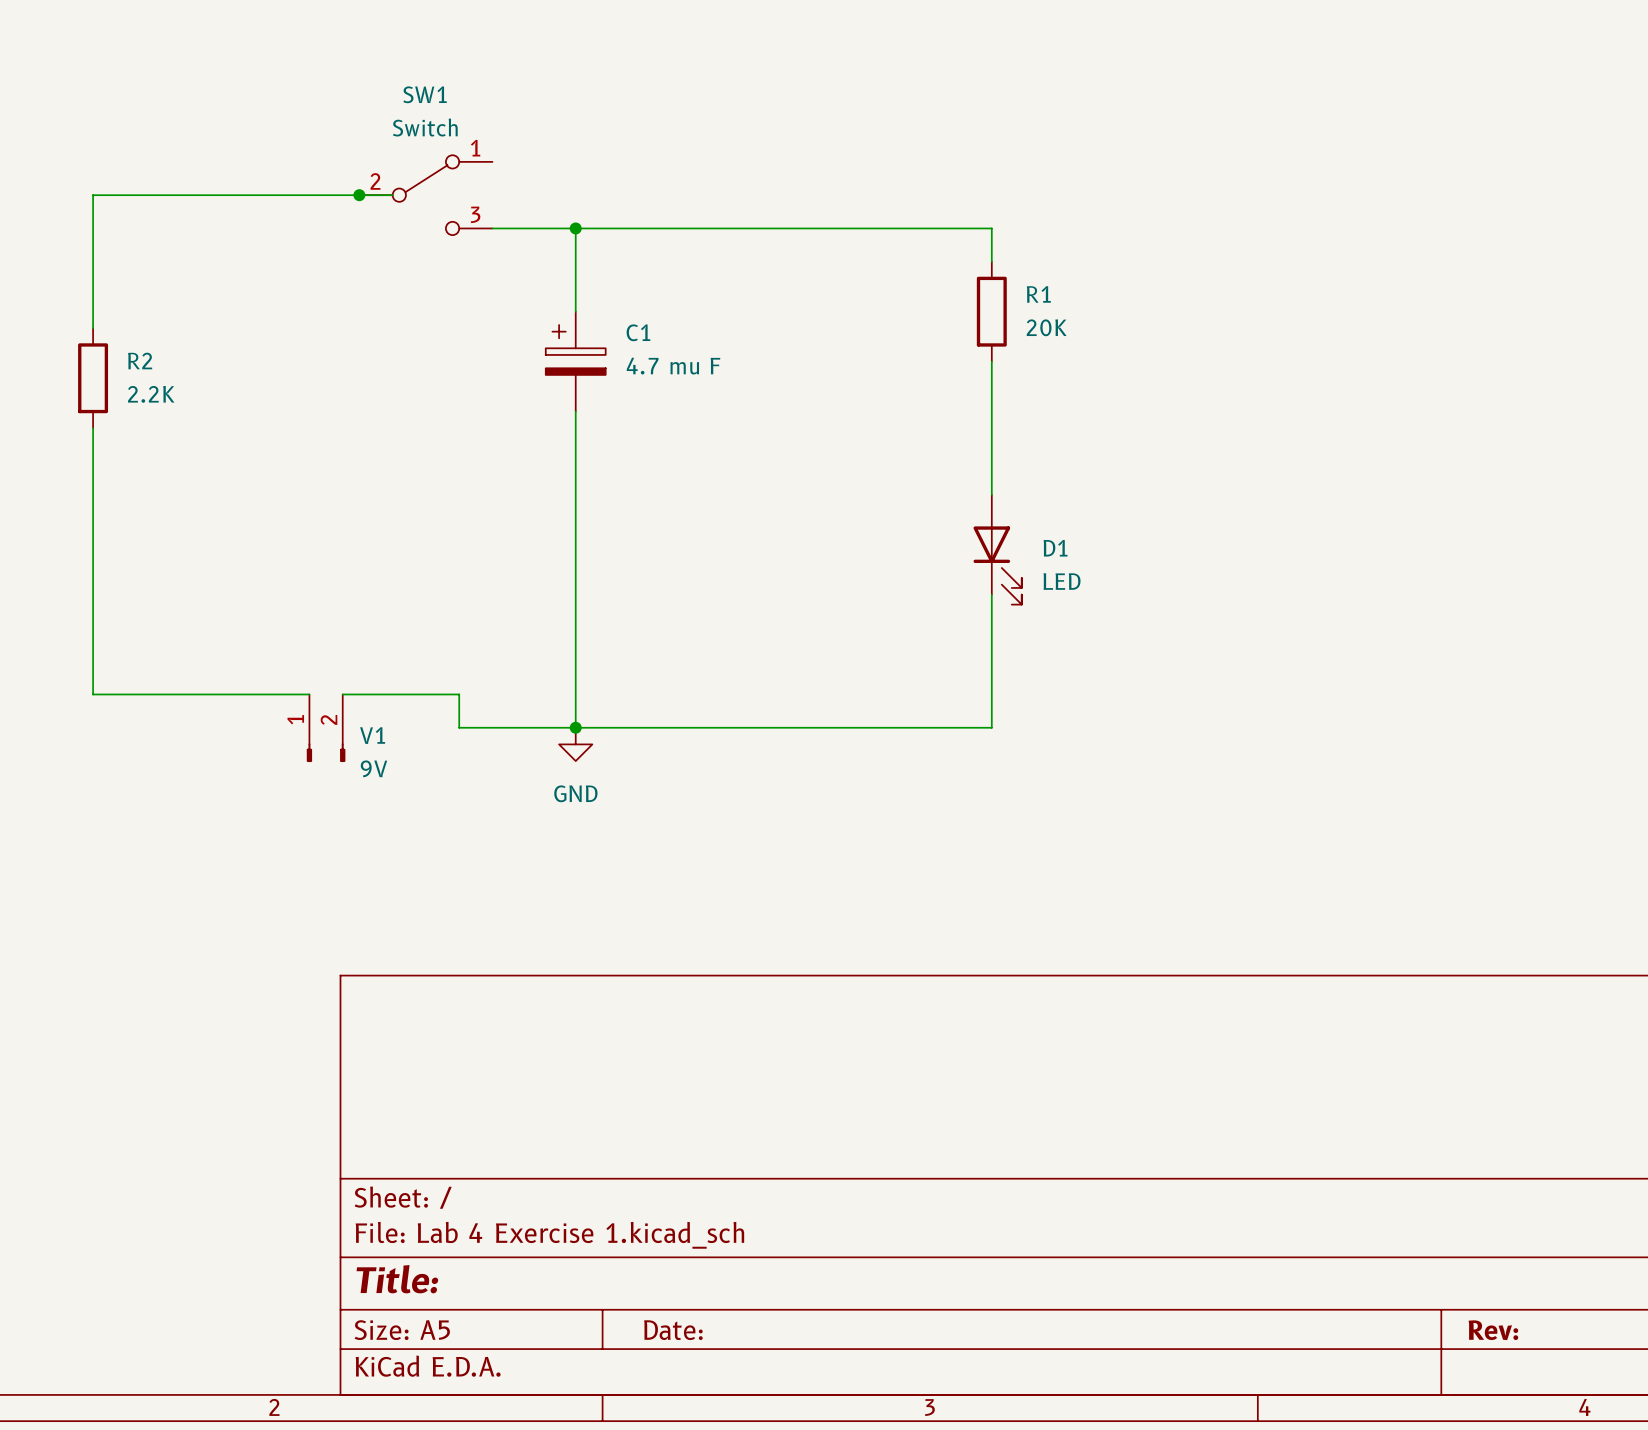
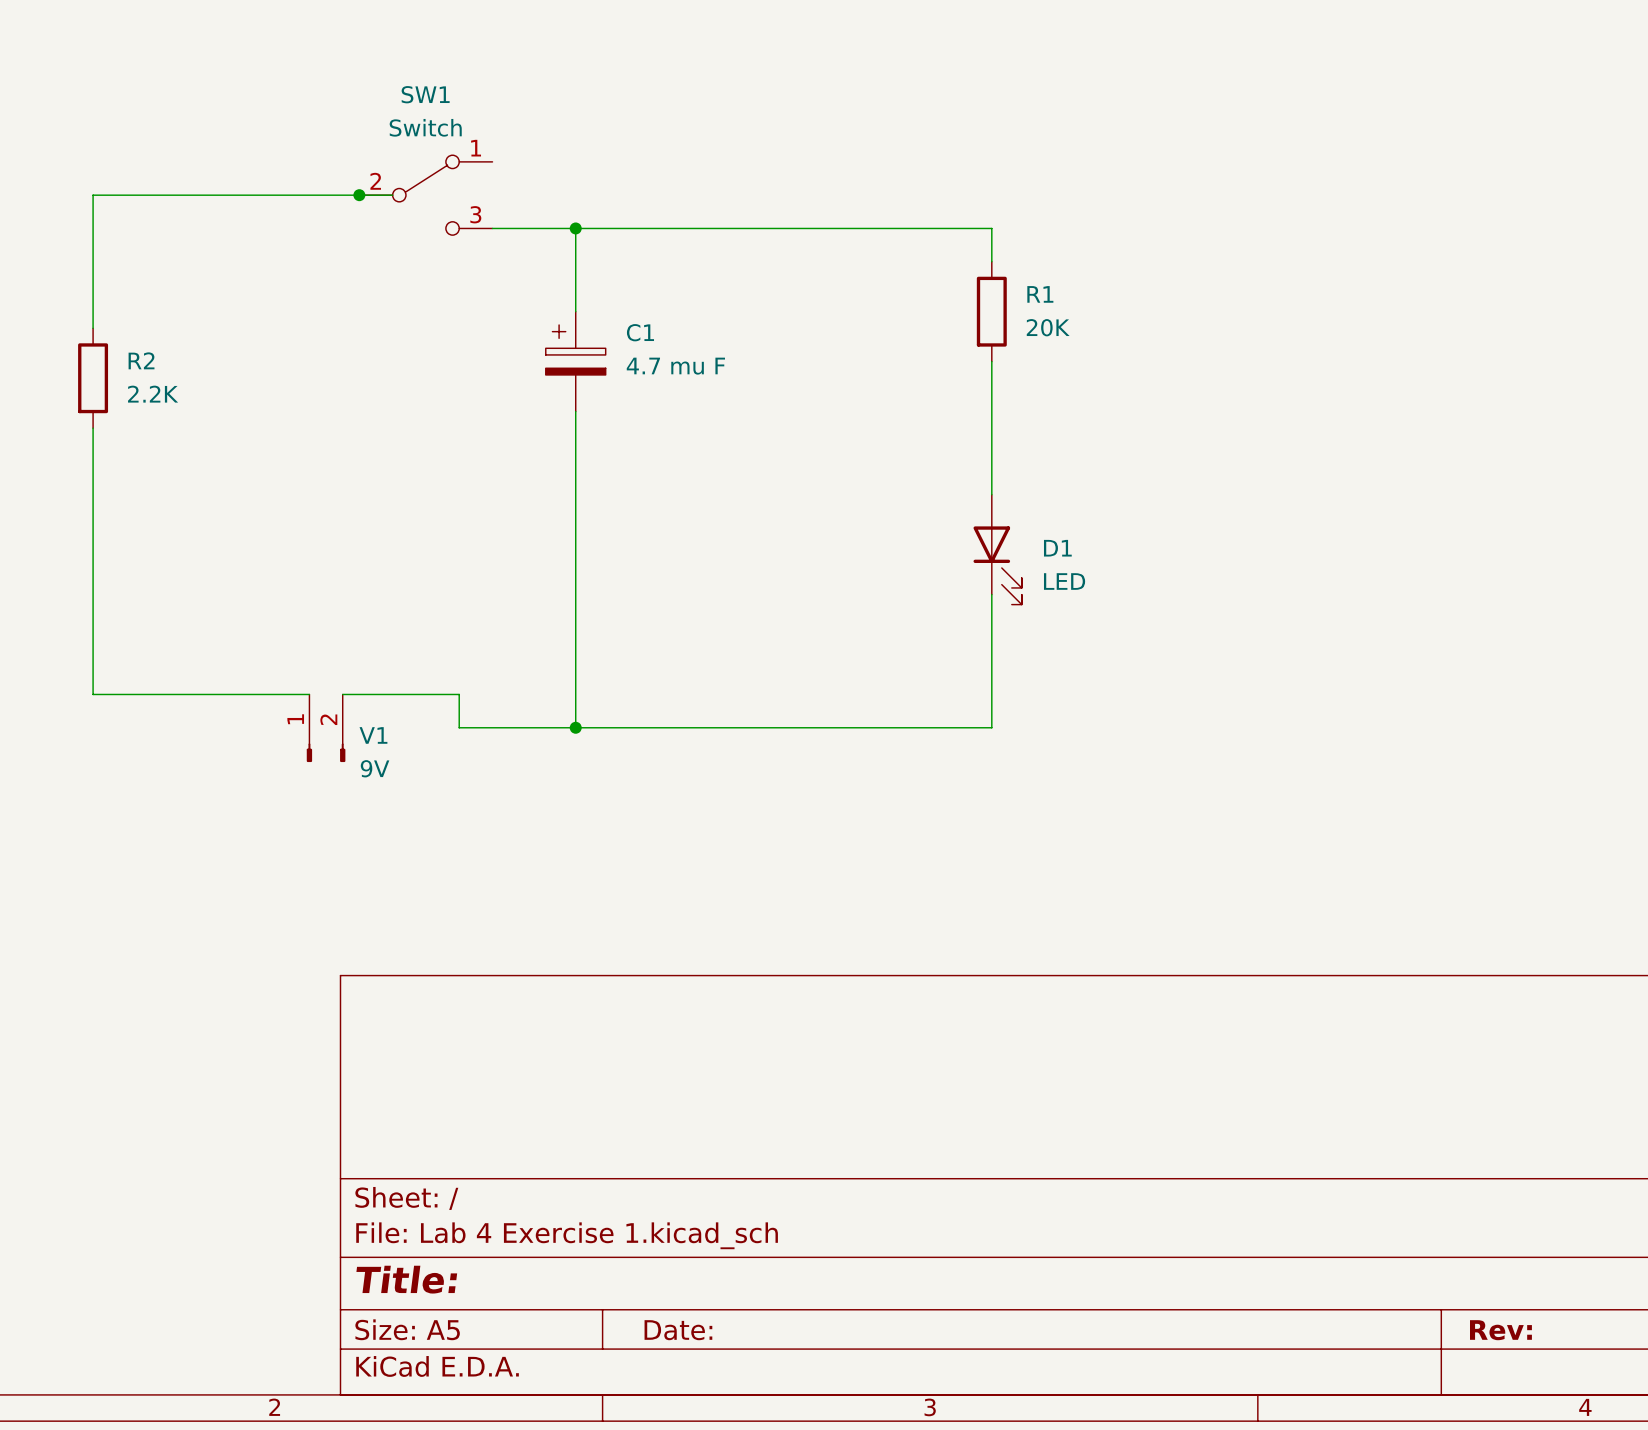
power symbol: GND (575, 744) -> none

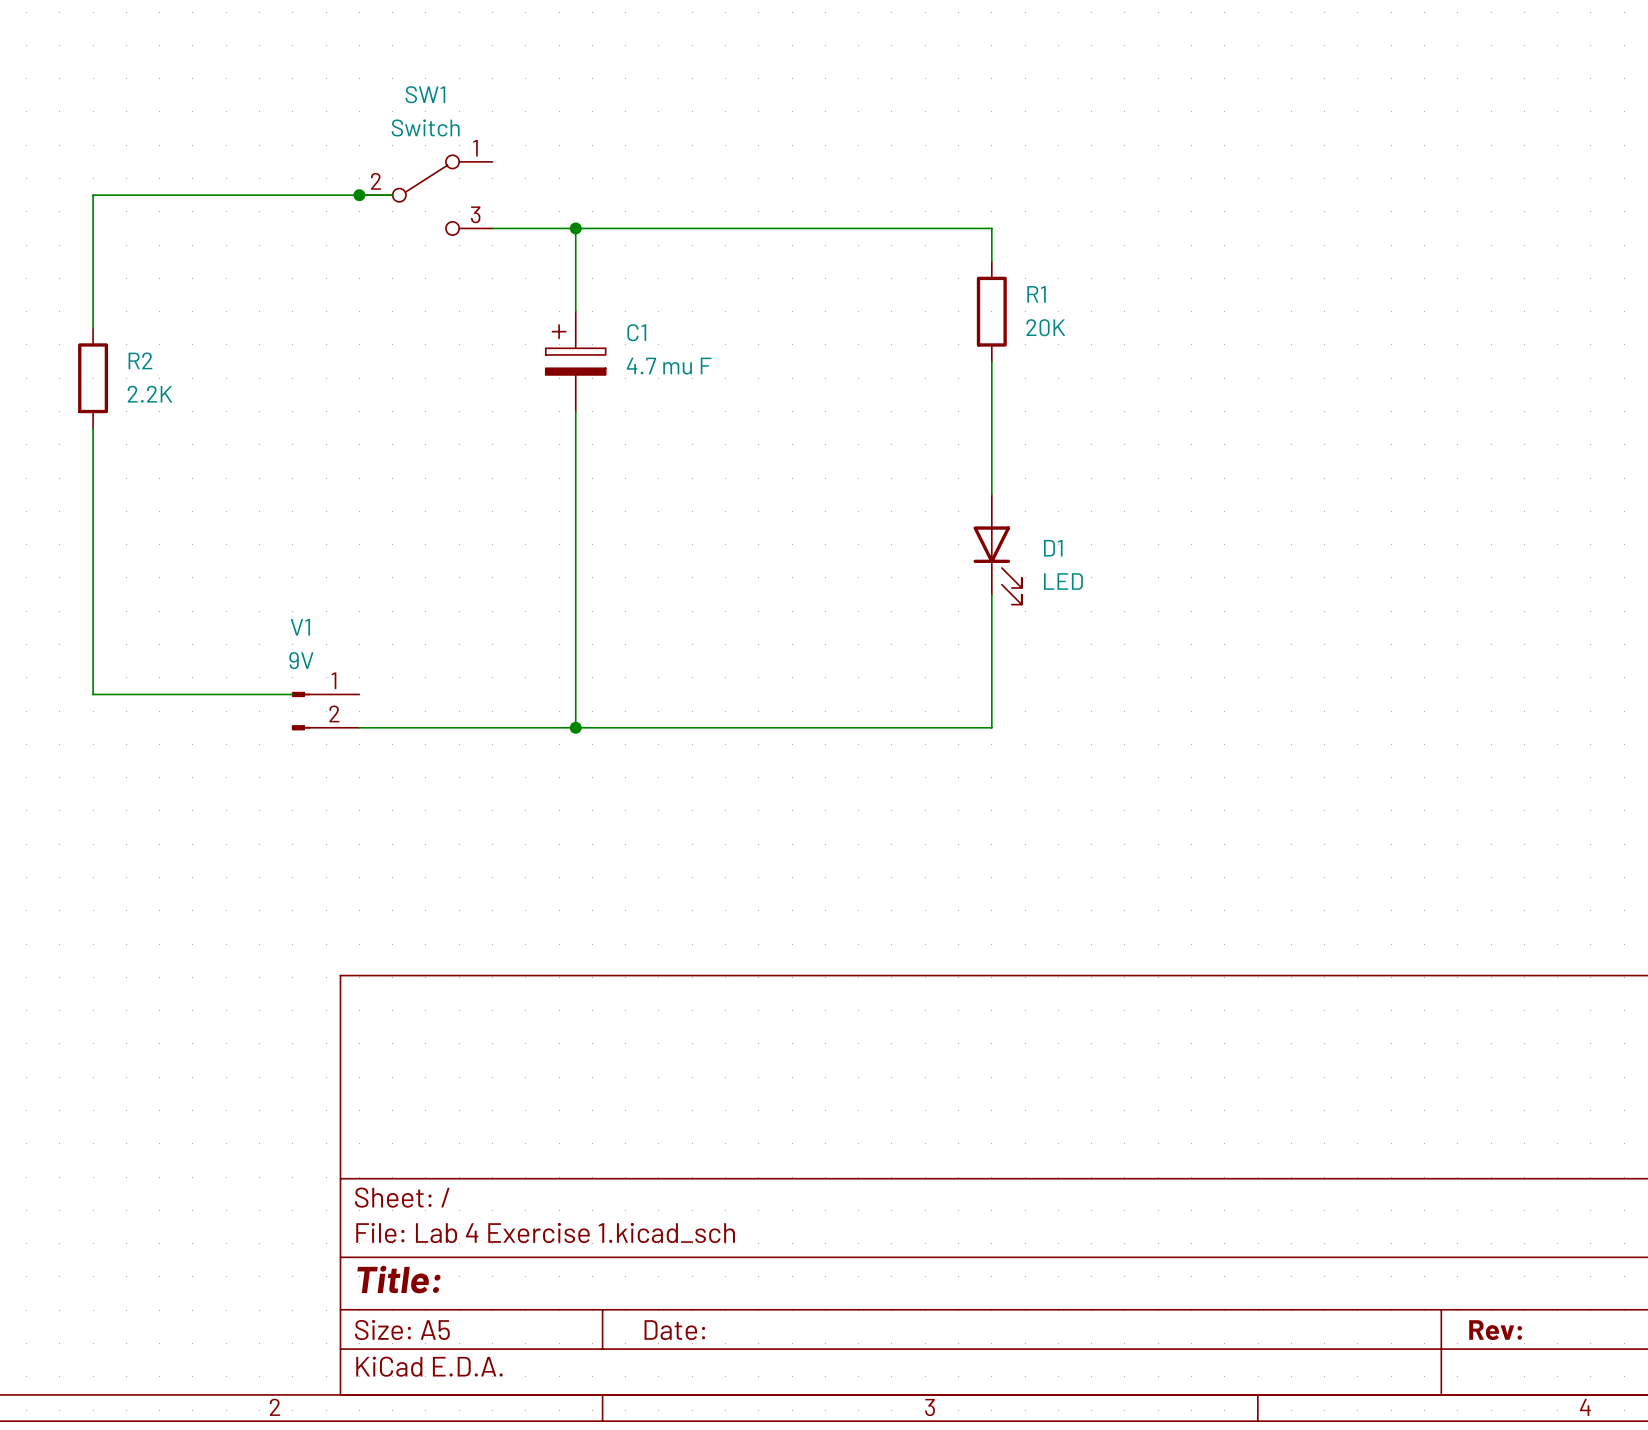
wire: (342, 694) (459, 694) (459, 727) -> (359, 727) (459, 727)
V1 name position: V1 (373, 735) -> V1 (300, 627)
V1 rotation: 0° (326, 752) -> 90° clockwise (301, 711)
V1 value position: 9V (375, 768) -> 9V (301, 660)

